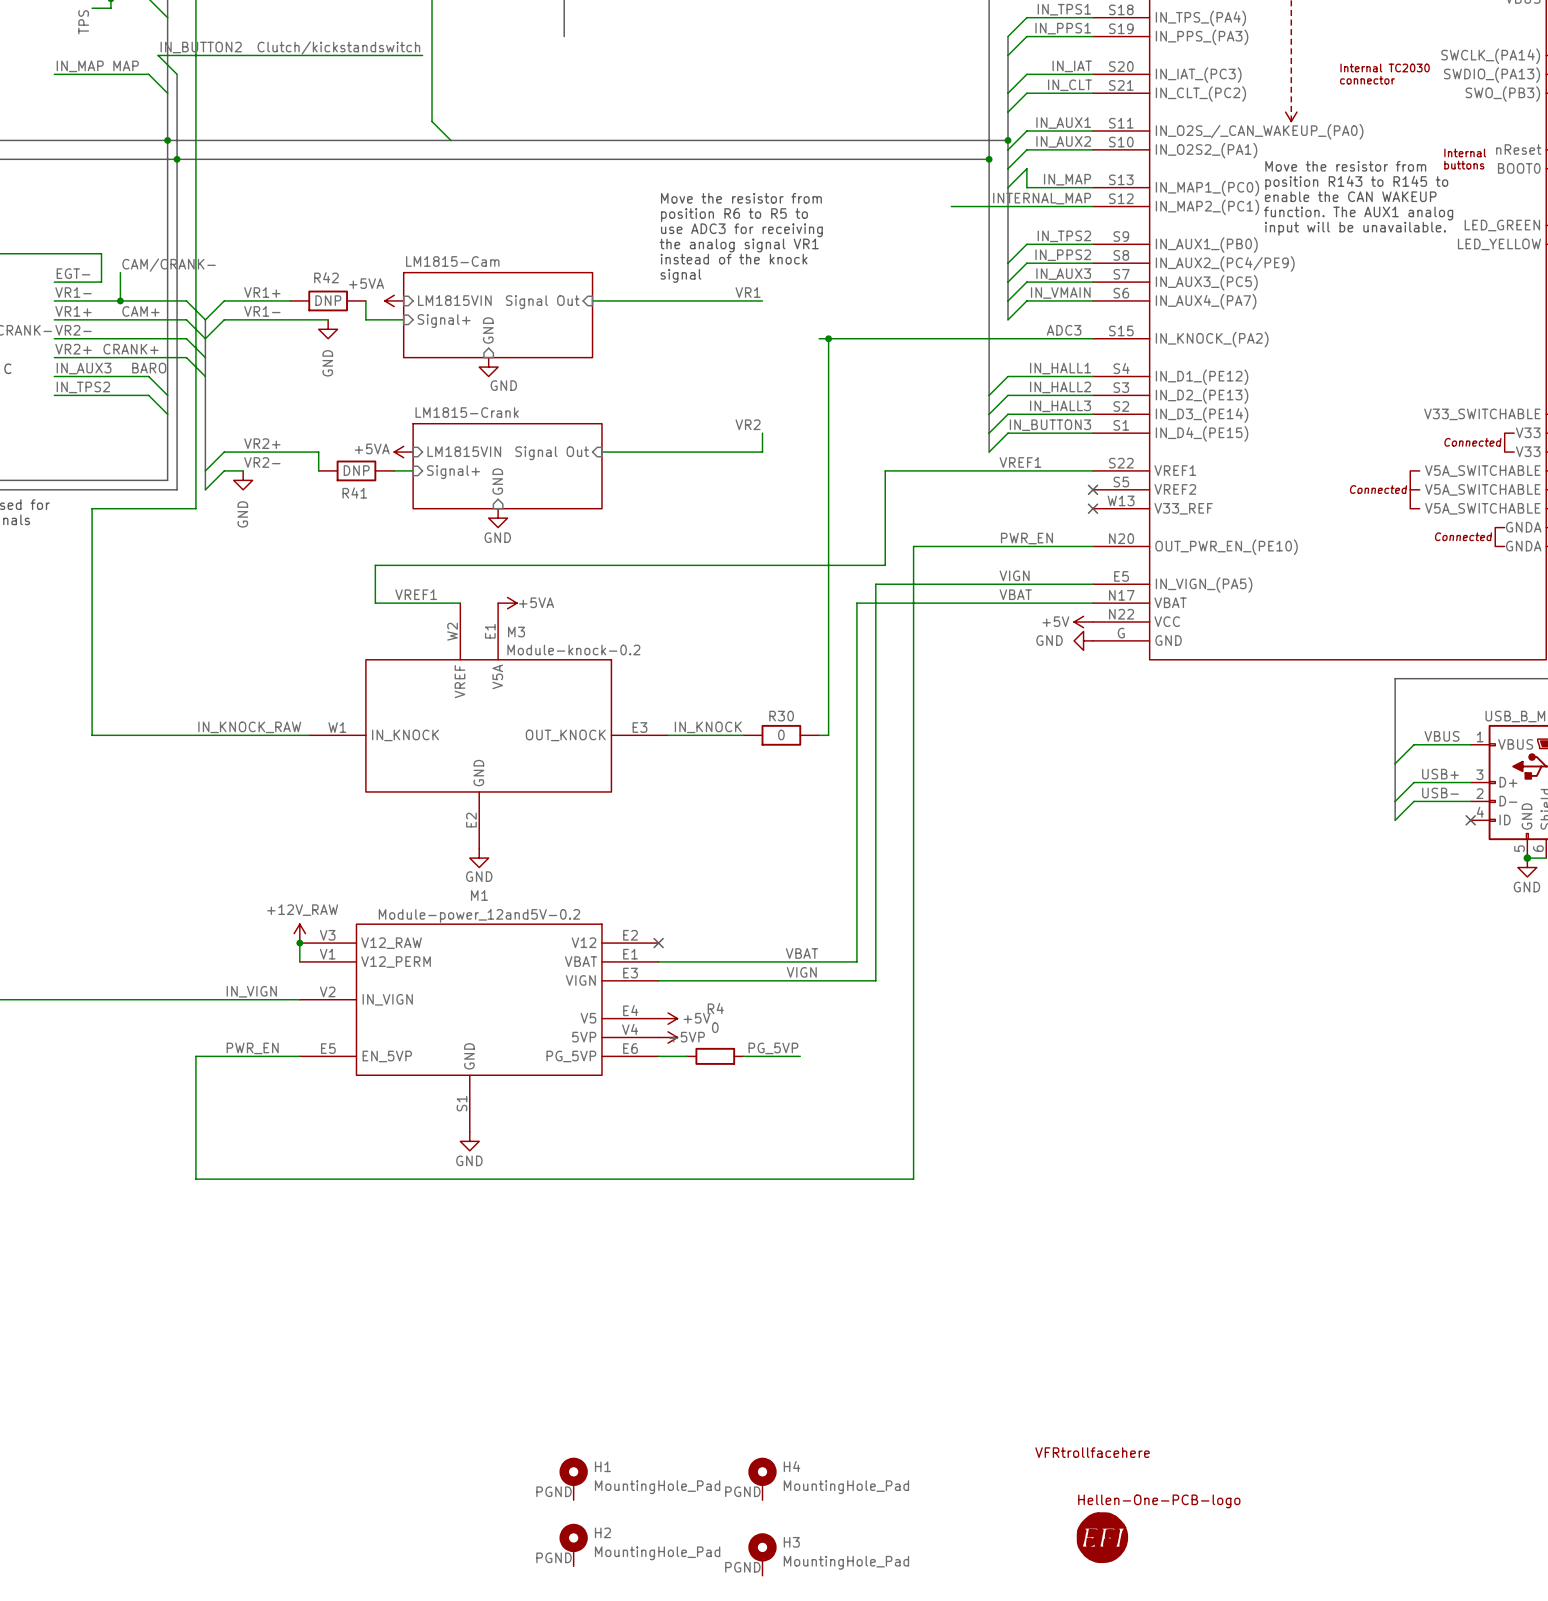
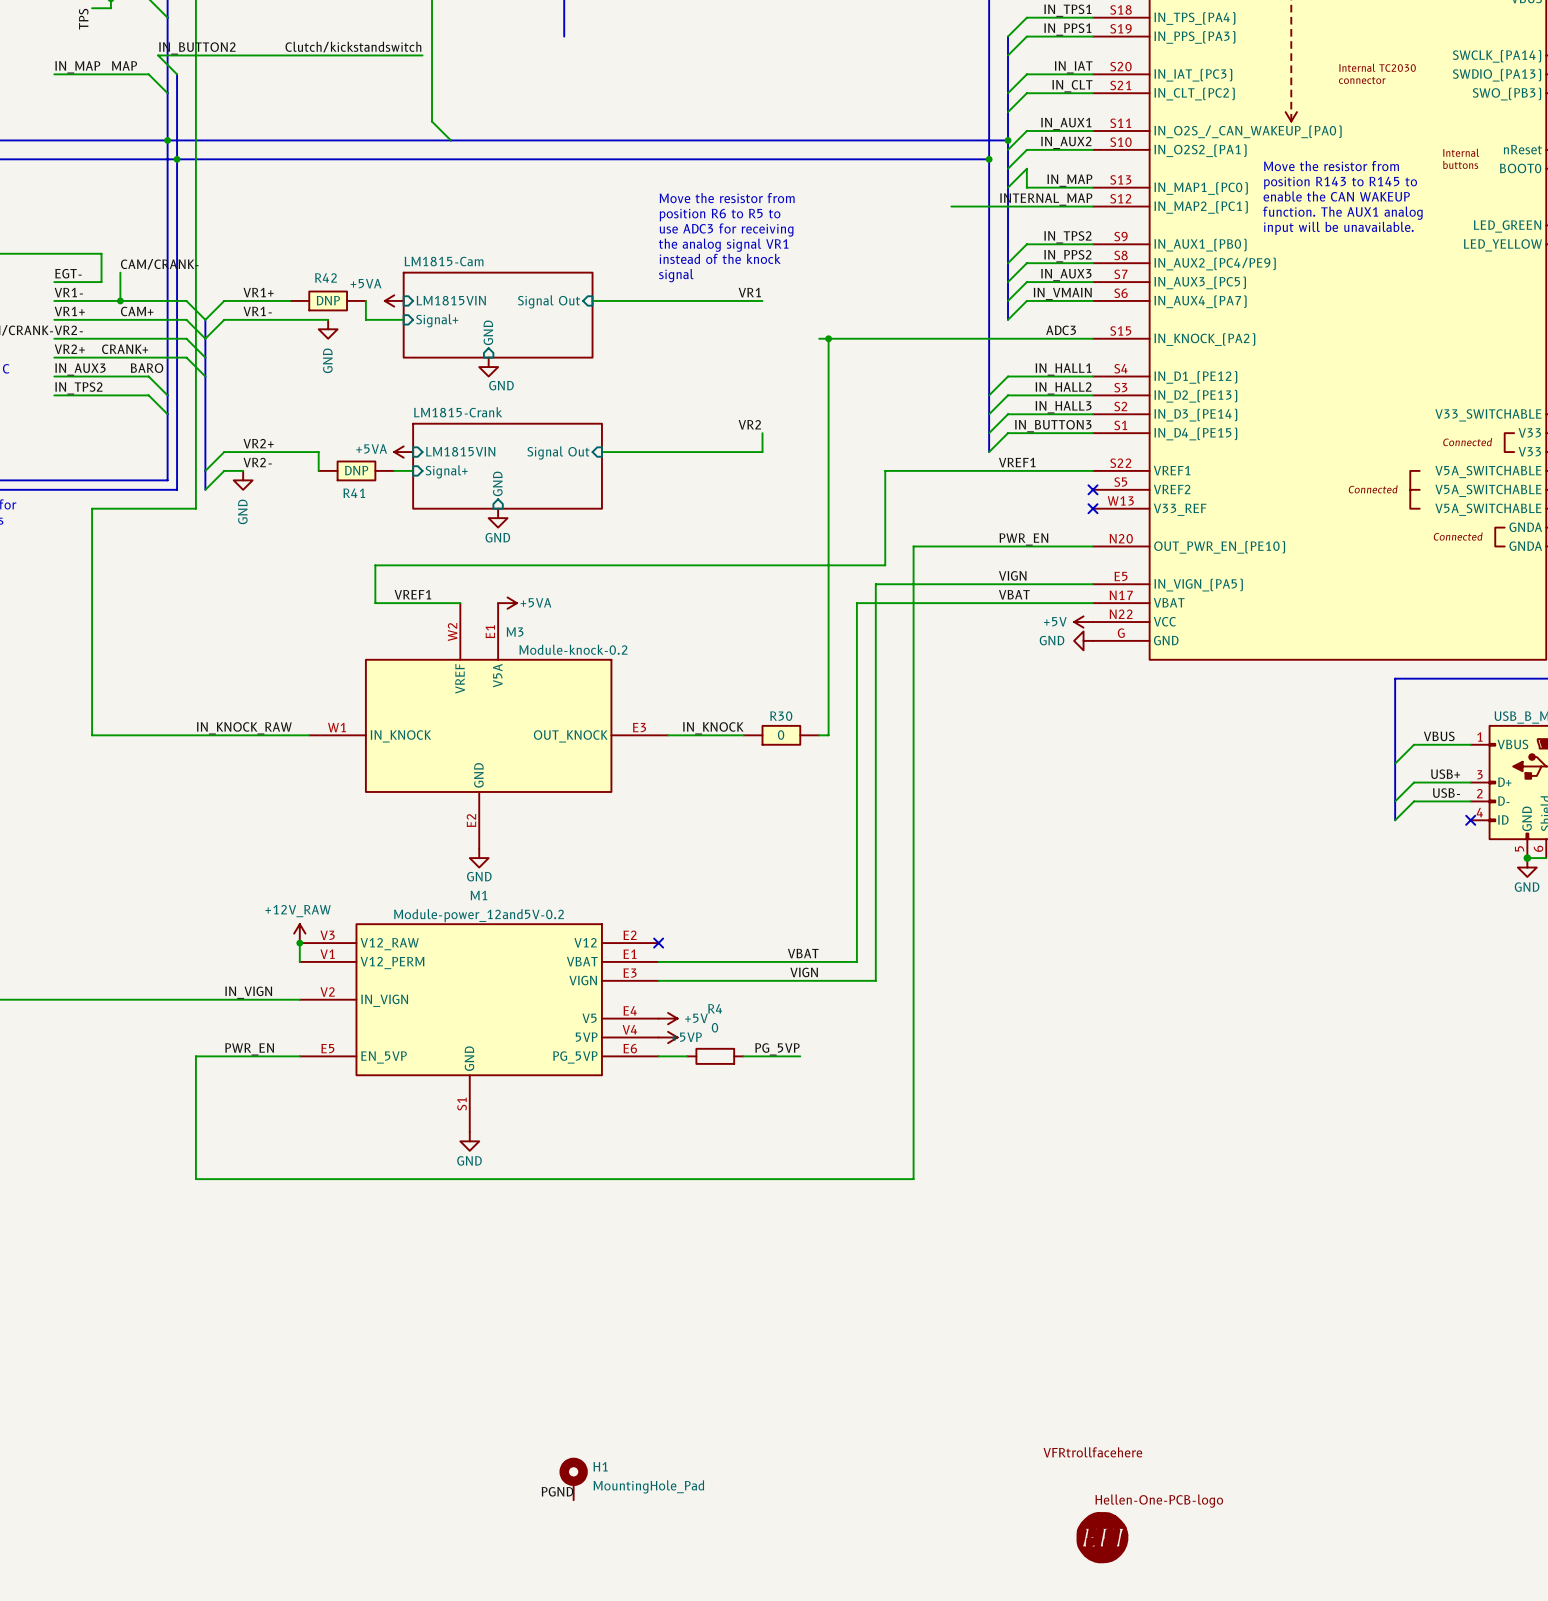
H4: MountingHole_Pad (762, 1478) -> none
label: PGND (742, 1491) -> none
H2: MountingHole_Pad (573, 1545) -> none
H3: MountingHole_Pad (762, 1554) -> none
label: PGND (554, 1557) -> none
label: PGND (742, 1567) -> none

